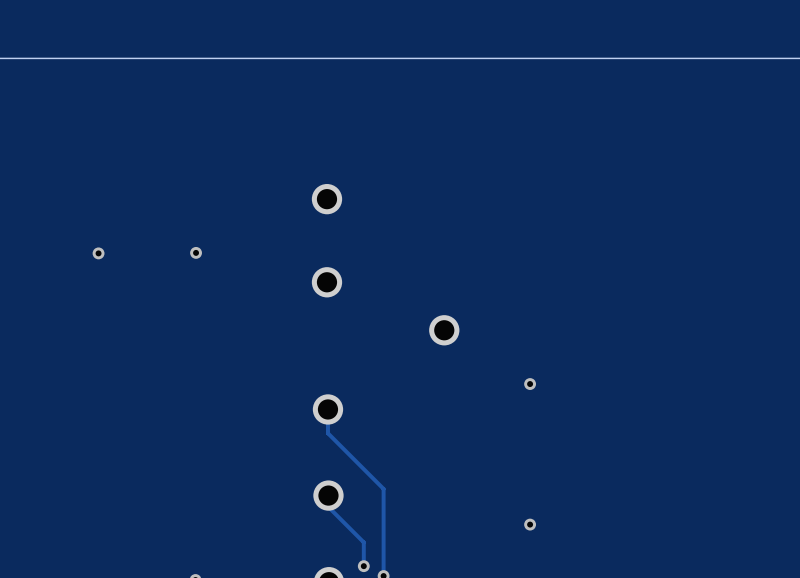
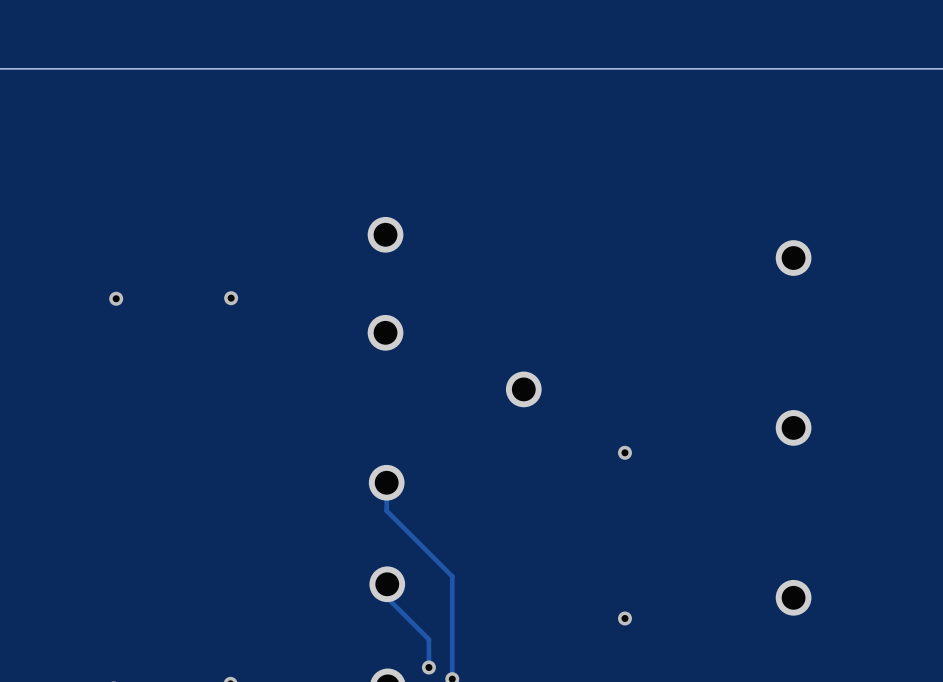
part: none -> (793, 258)
part: none -> (793, 427)
part: none -> (793, 597)

